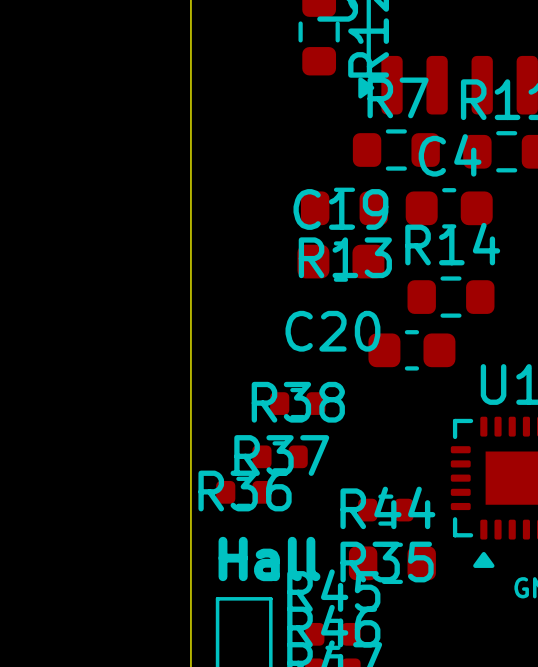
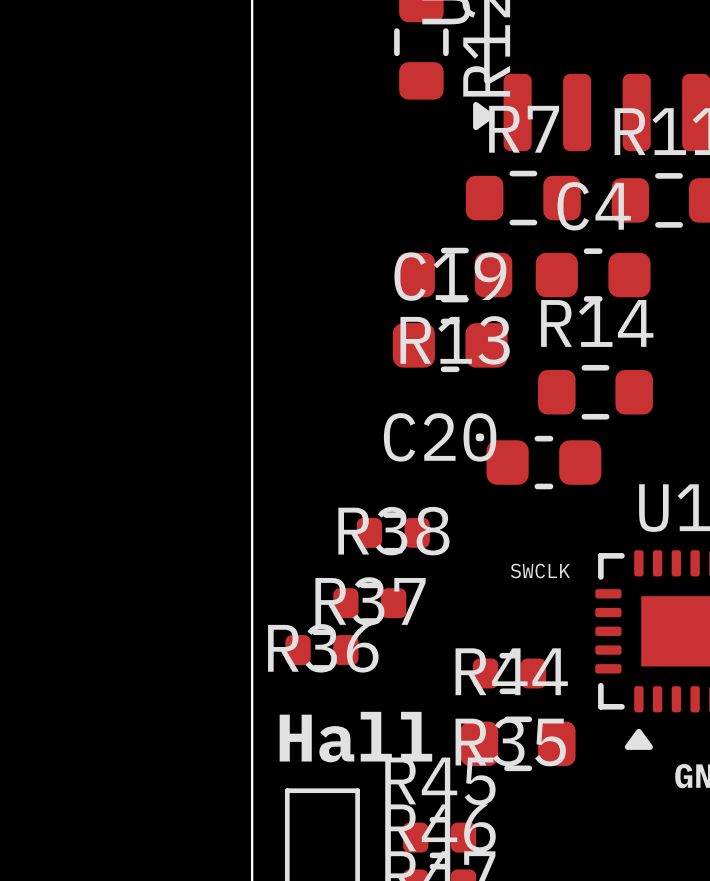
text: none -> SWCLK (540, 571)

